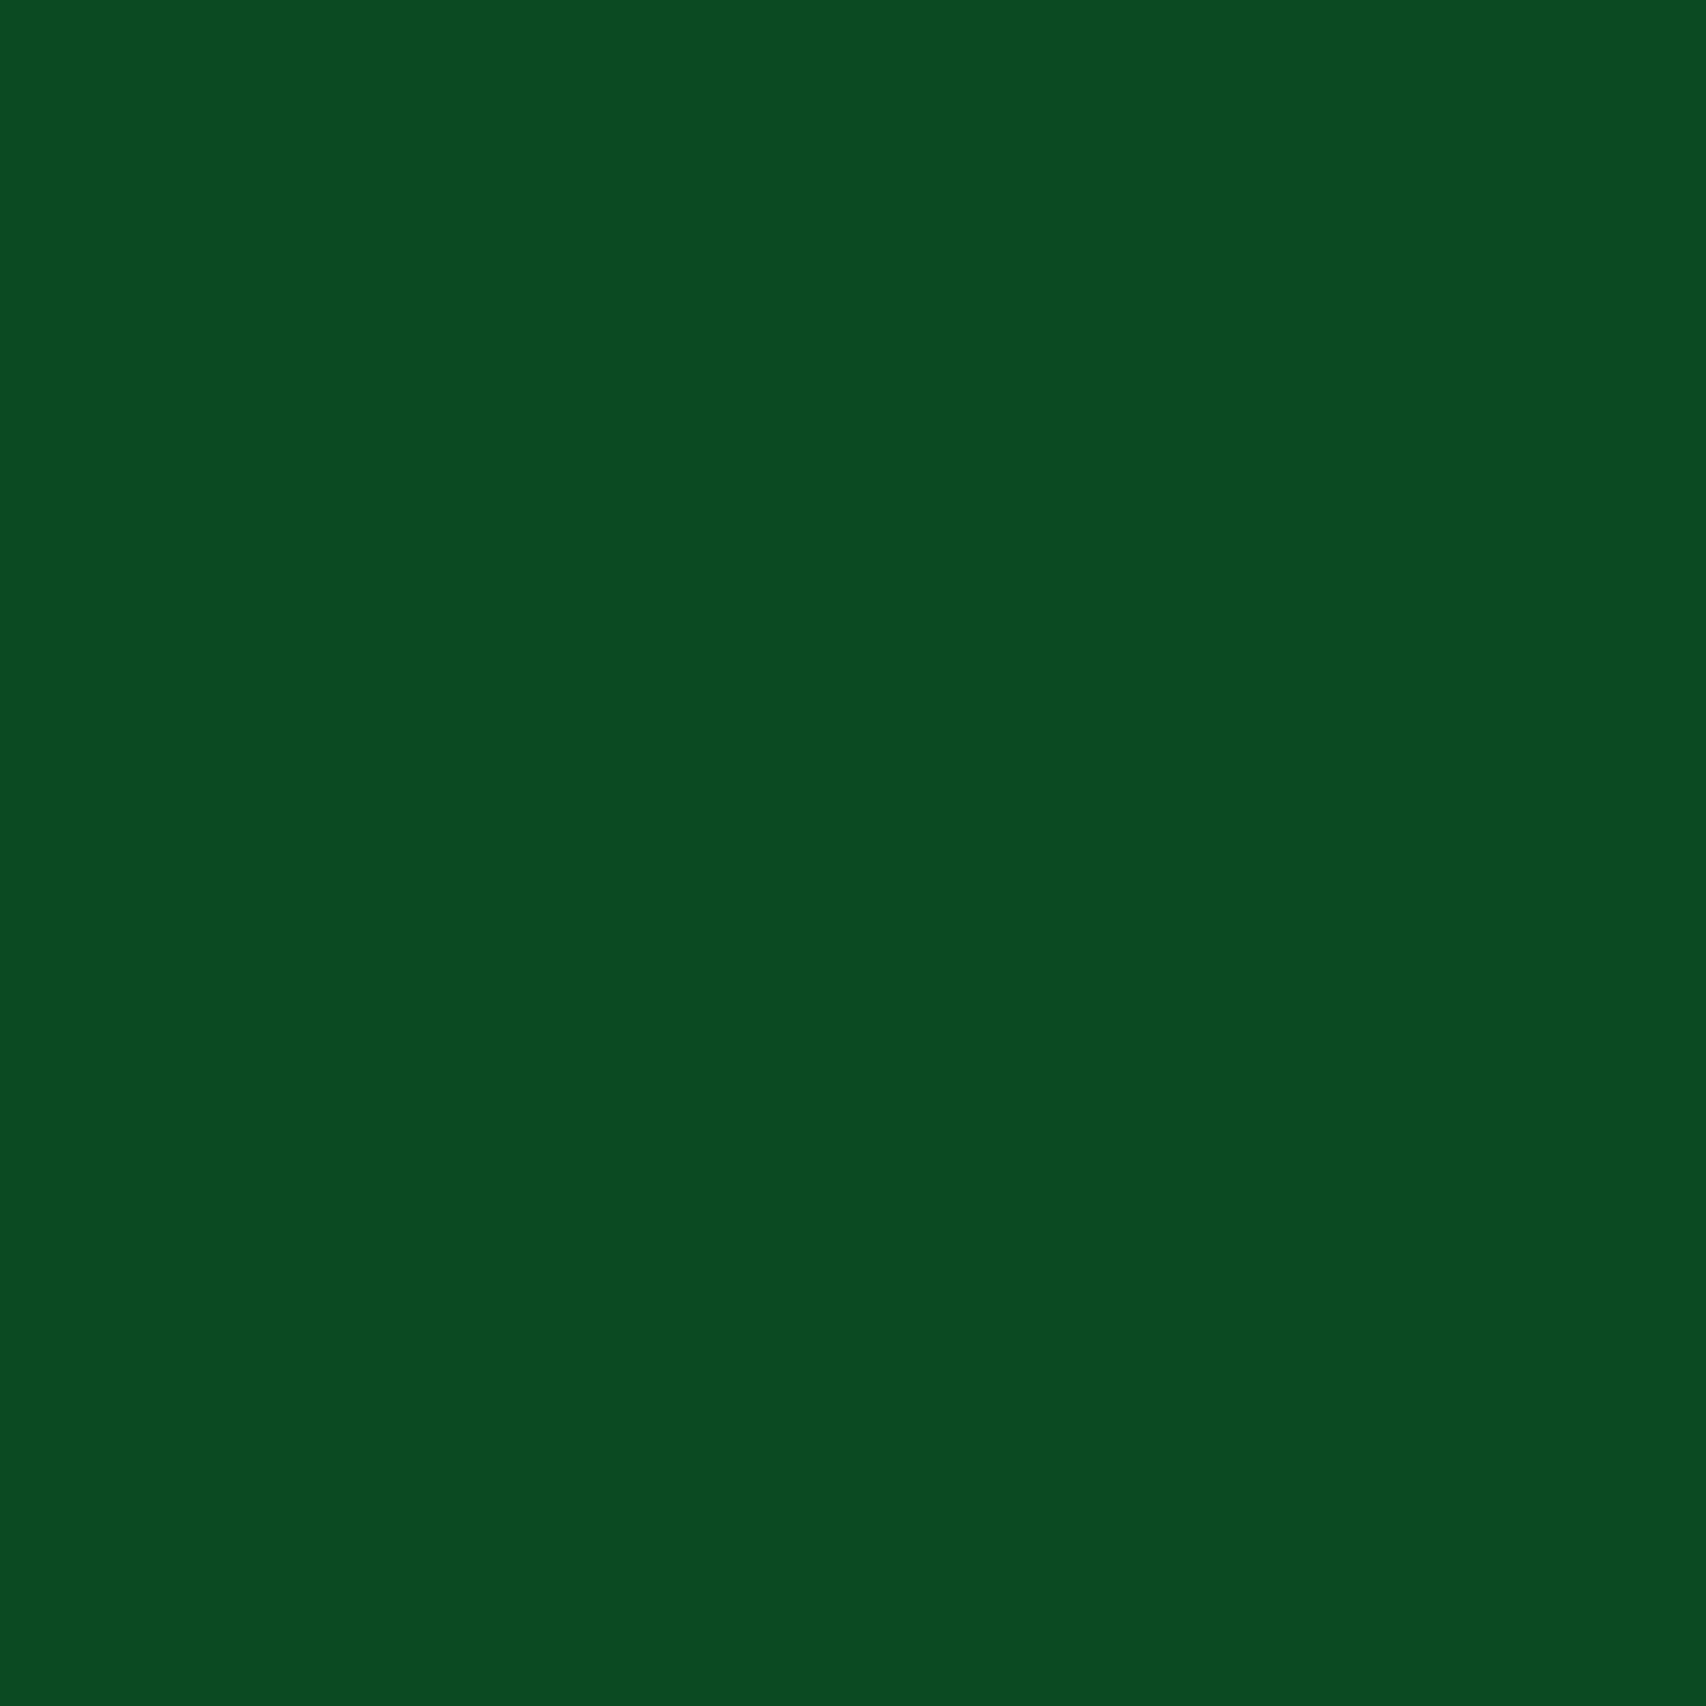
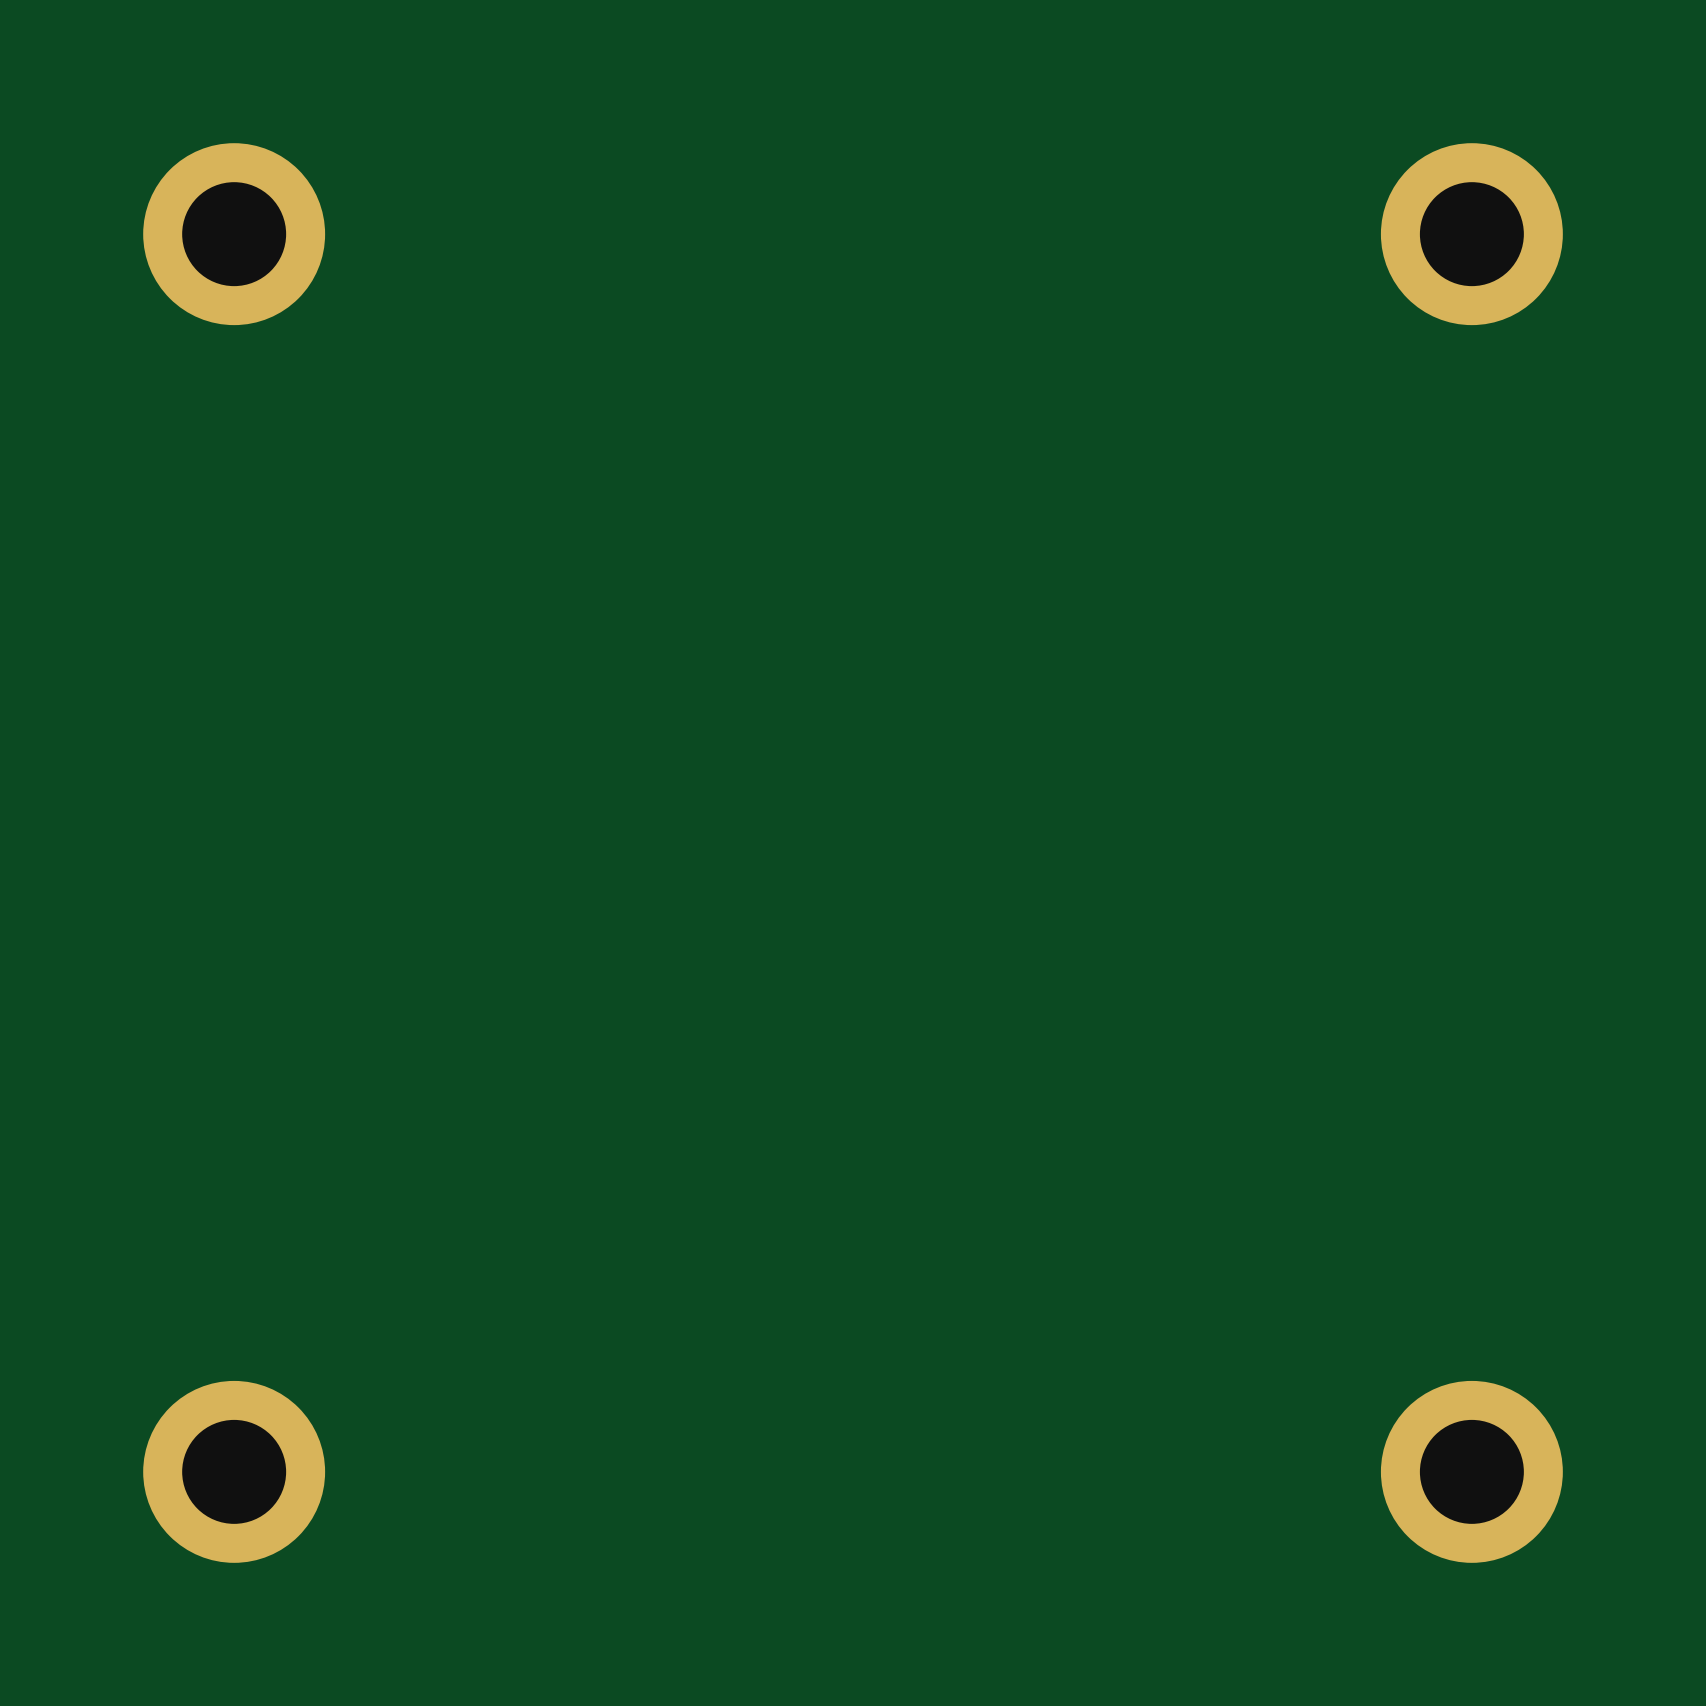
part: none -> (234, 234)
part: none -> (1471, 234)
part: none -> (234, 1471)
part: none -> (1471, 1471)

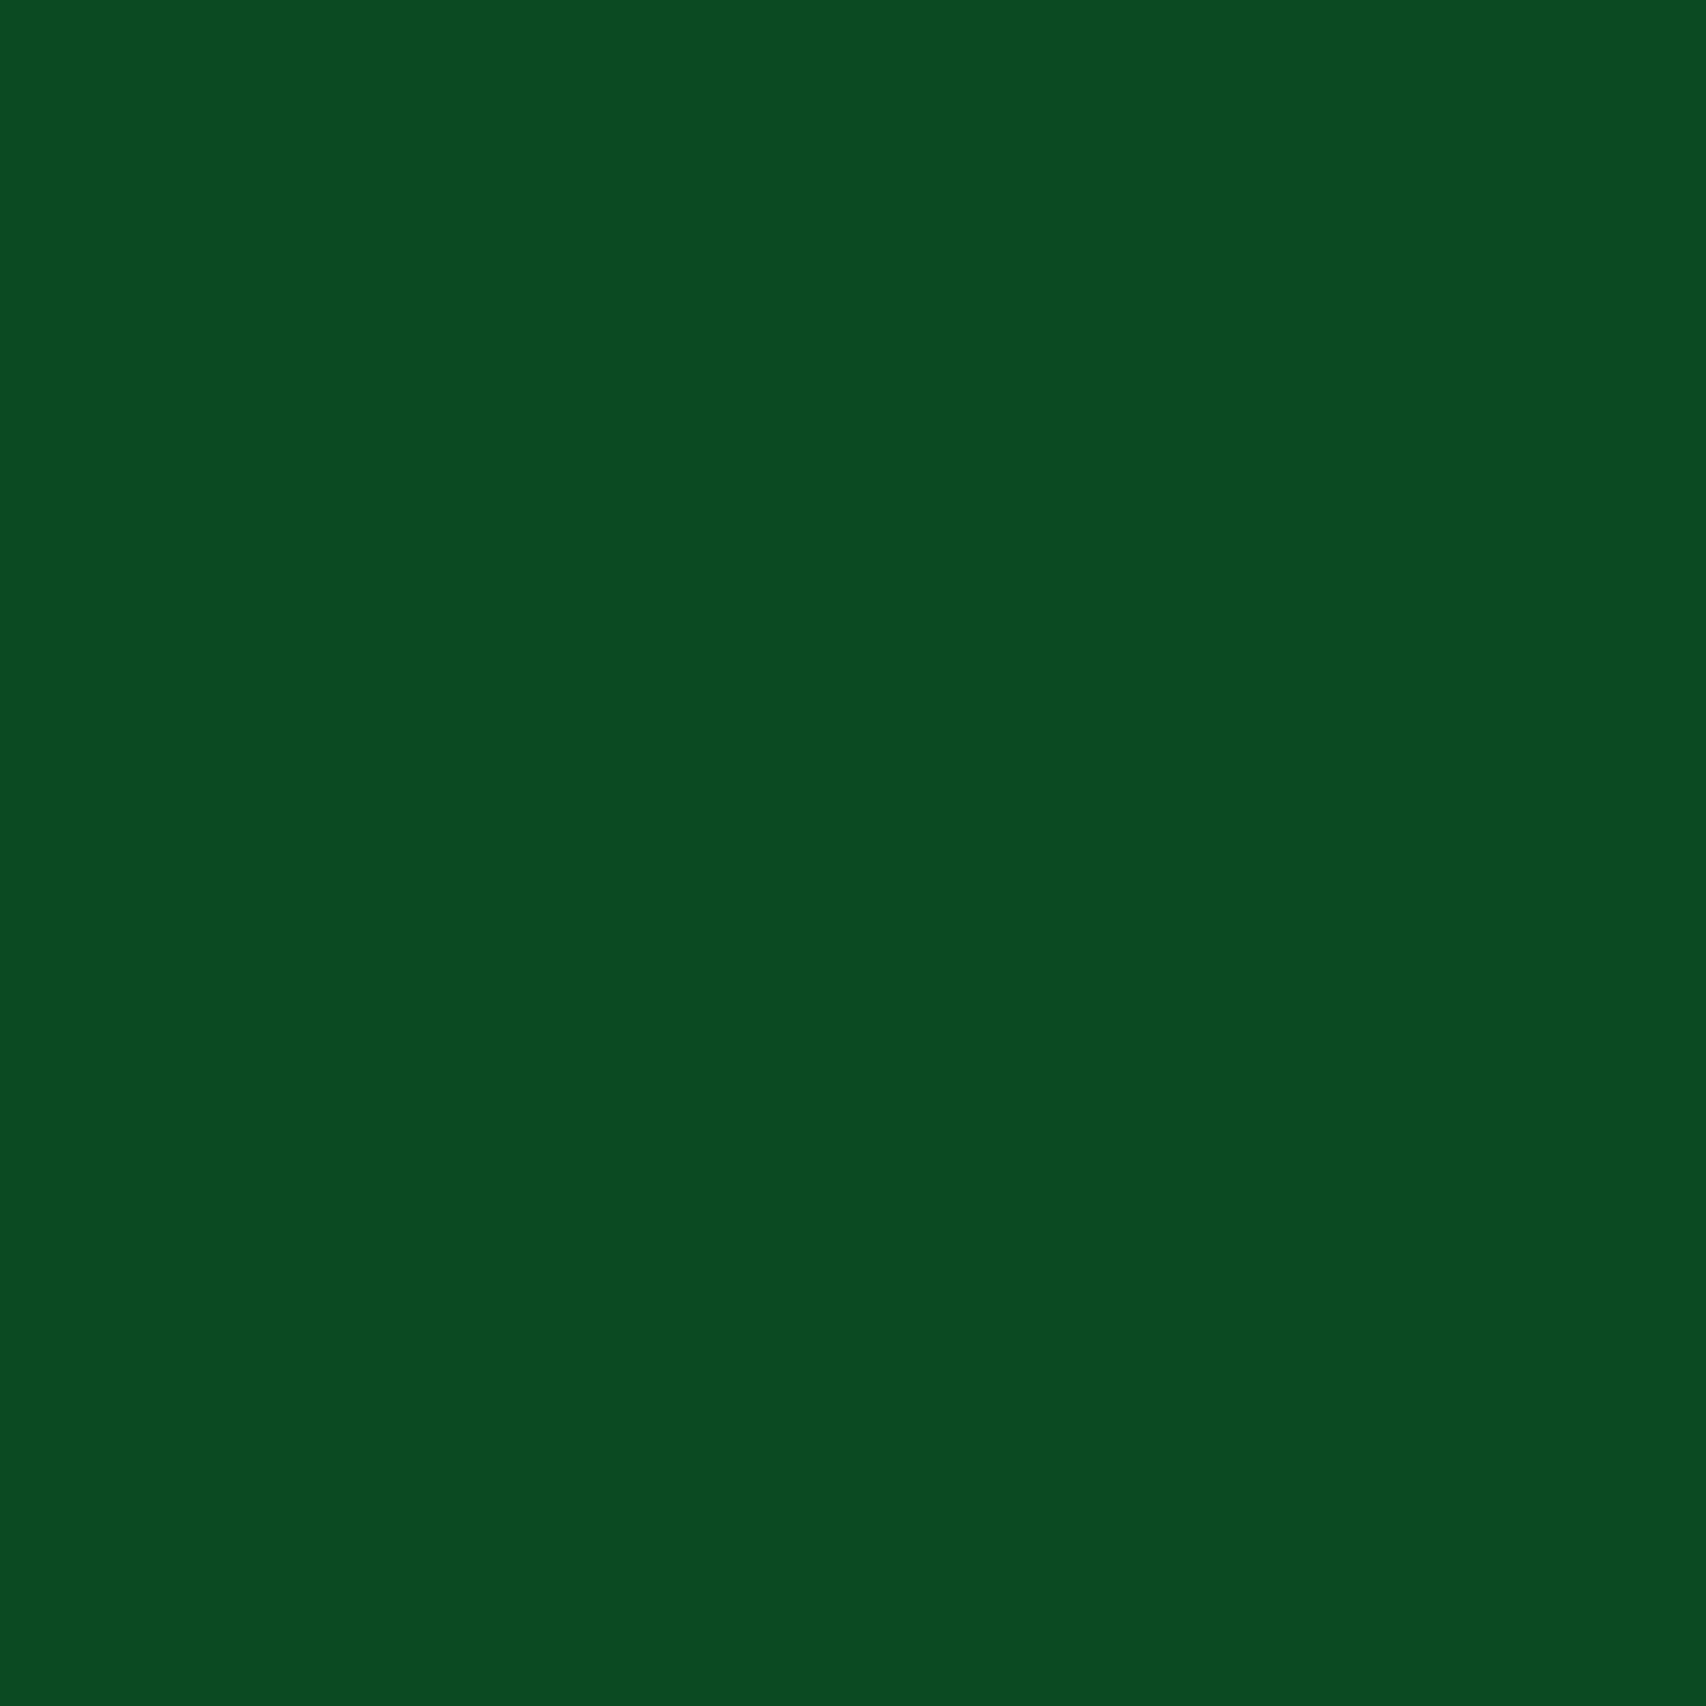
part: (234, 234) -> none
part: (1471, 234) -> none
part: (234, 1471) -> none
part: (1471, 1471) -> none

